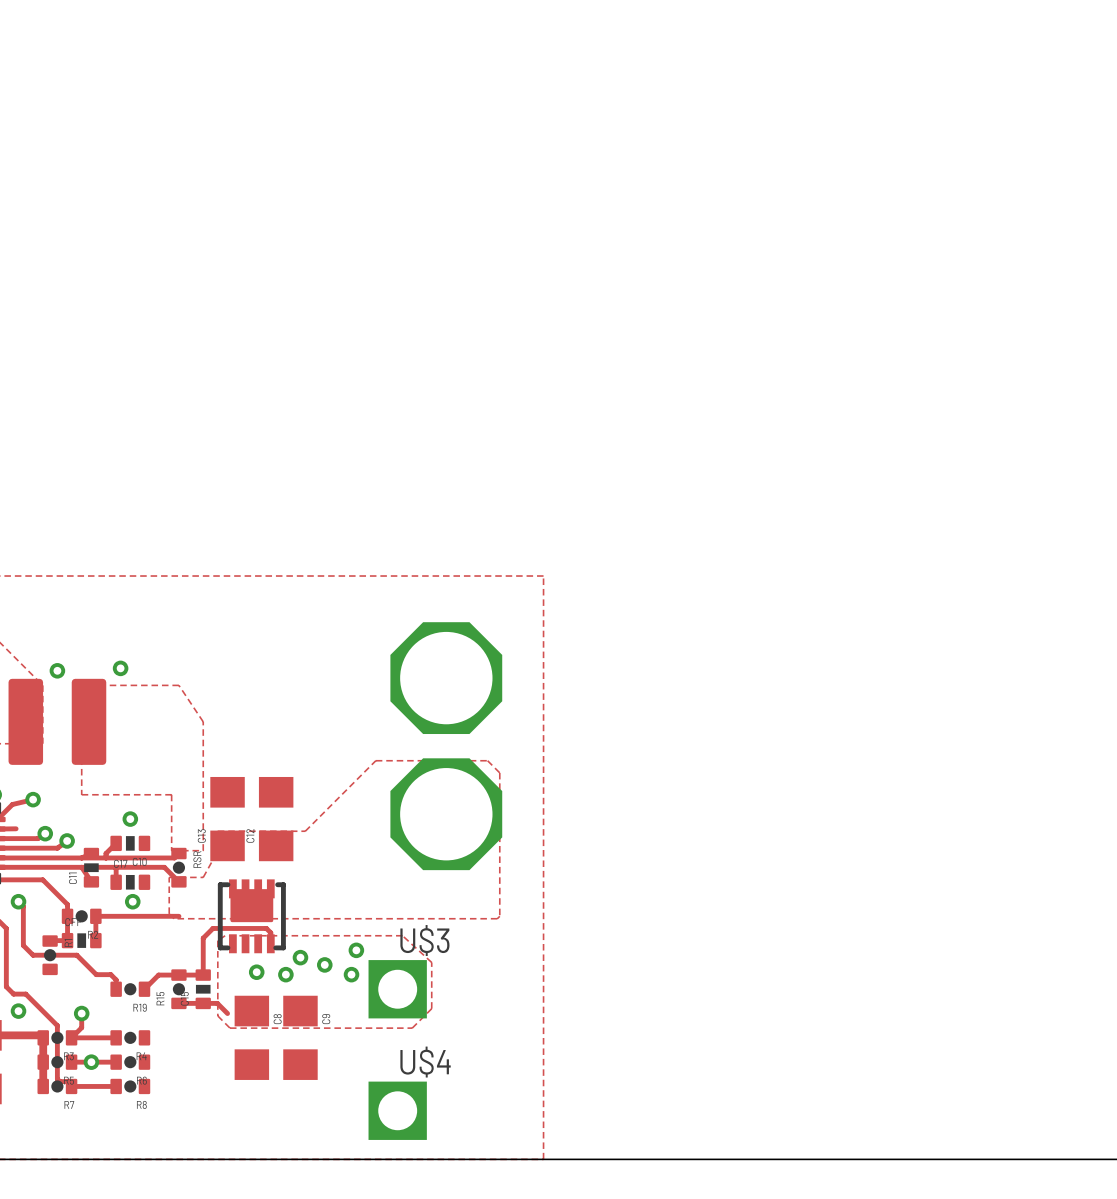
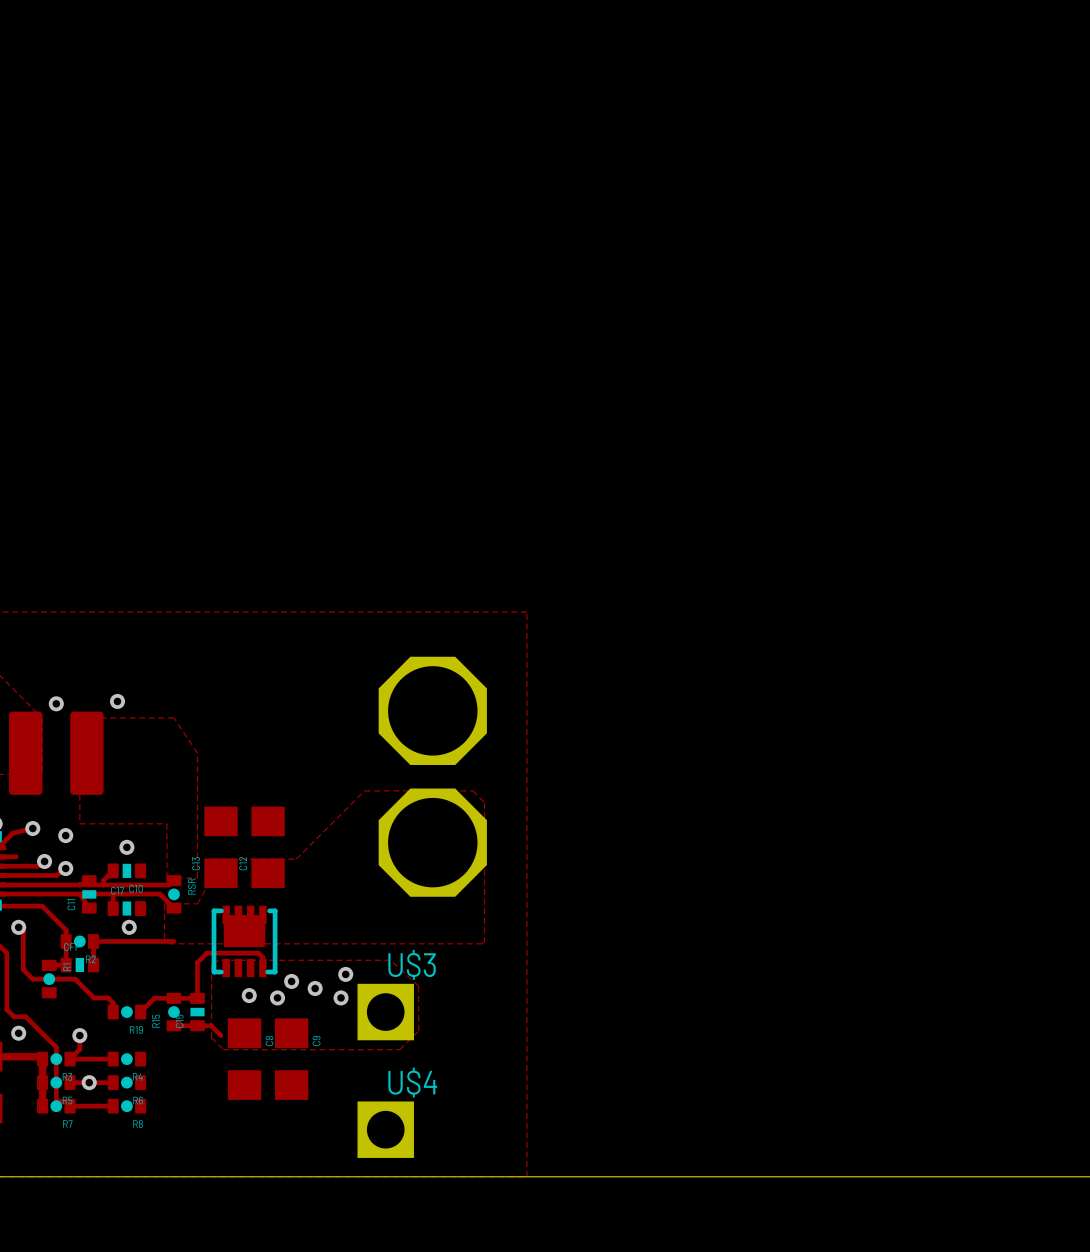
via: none -> (65, 835)

